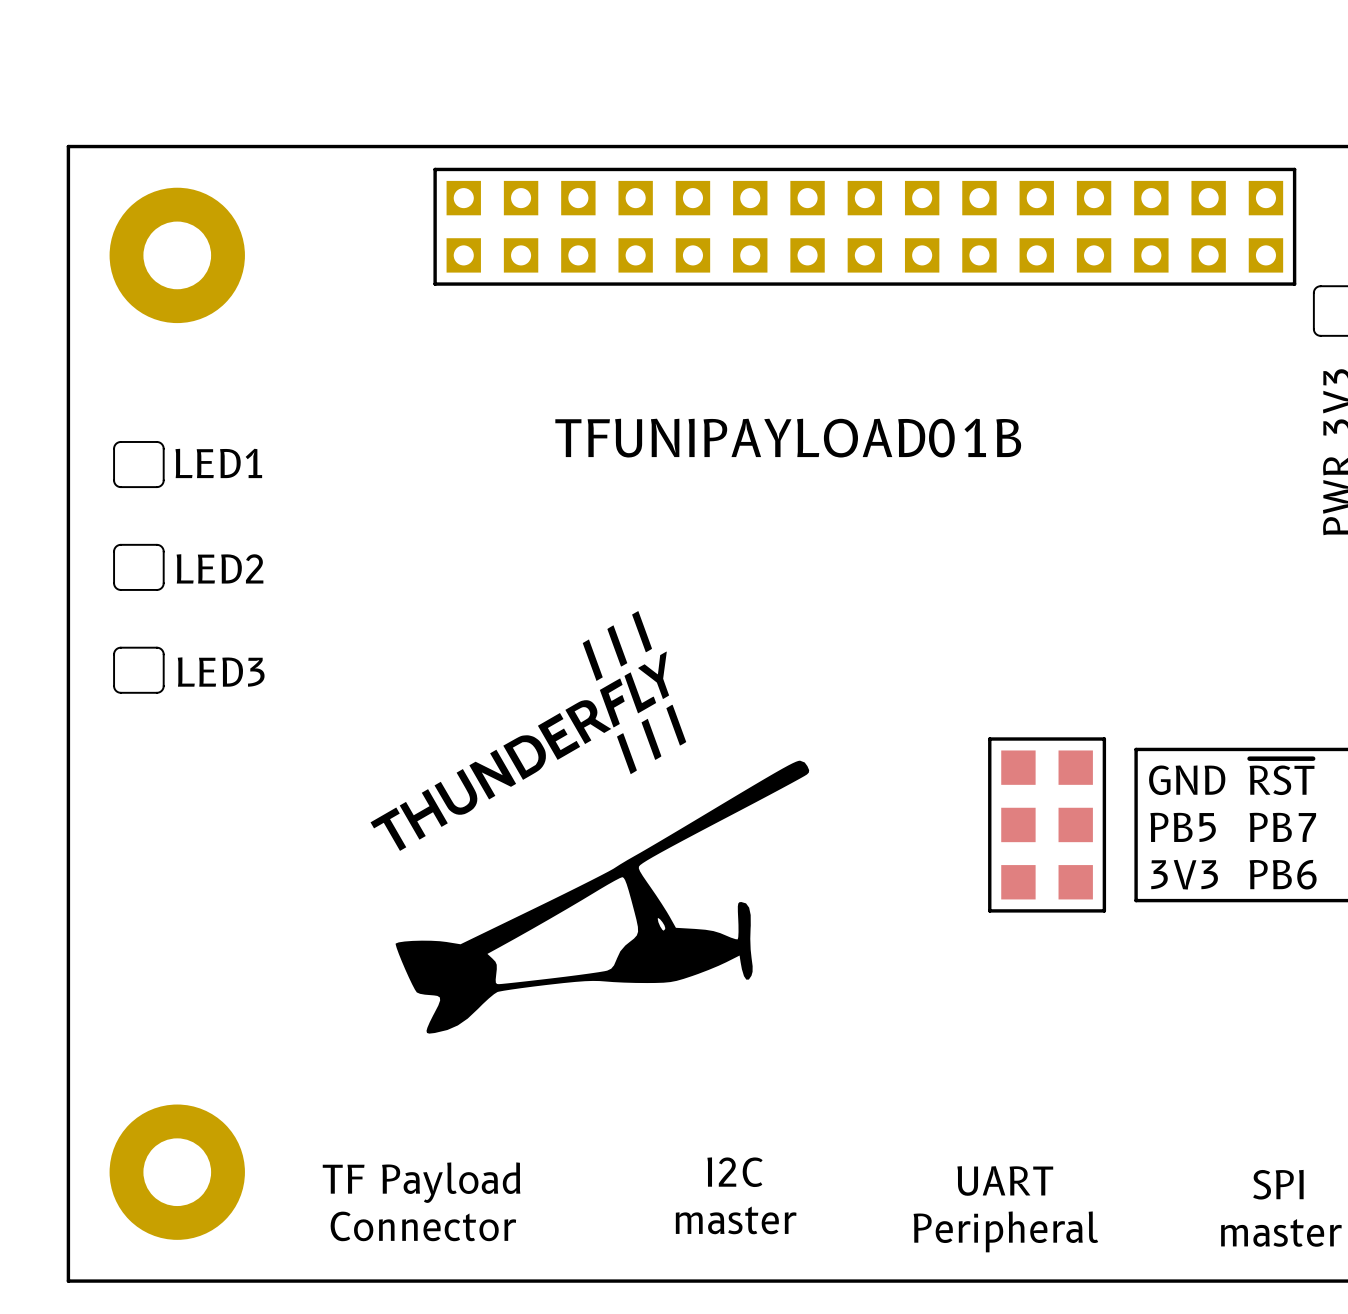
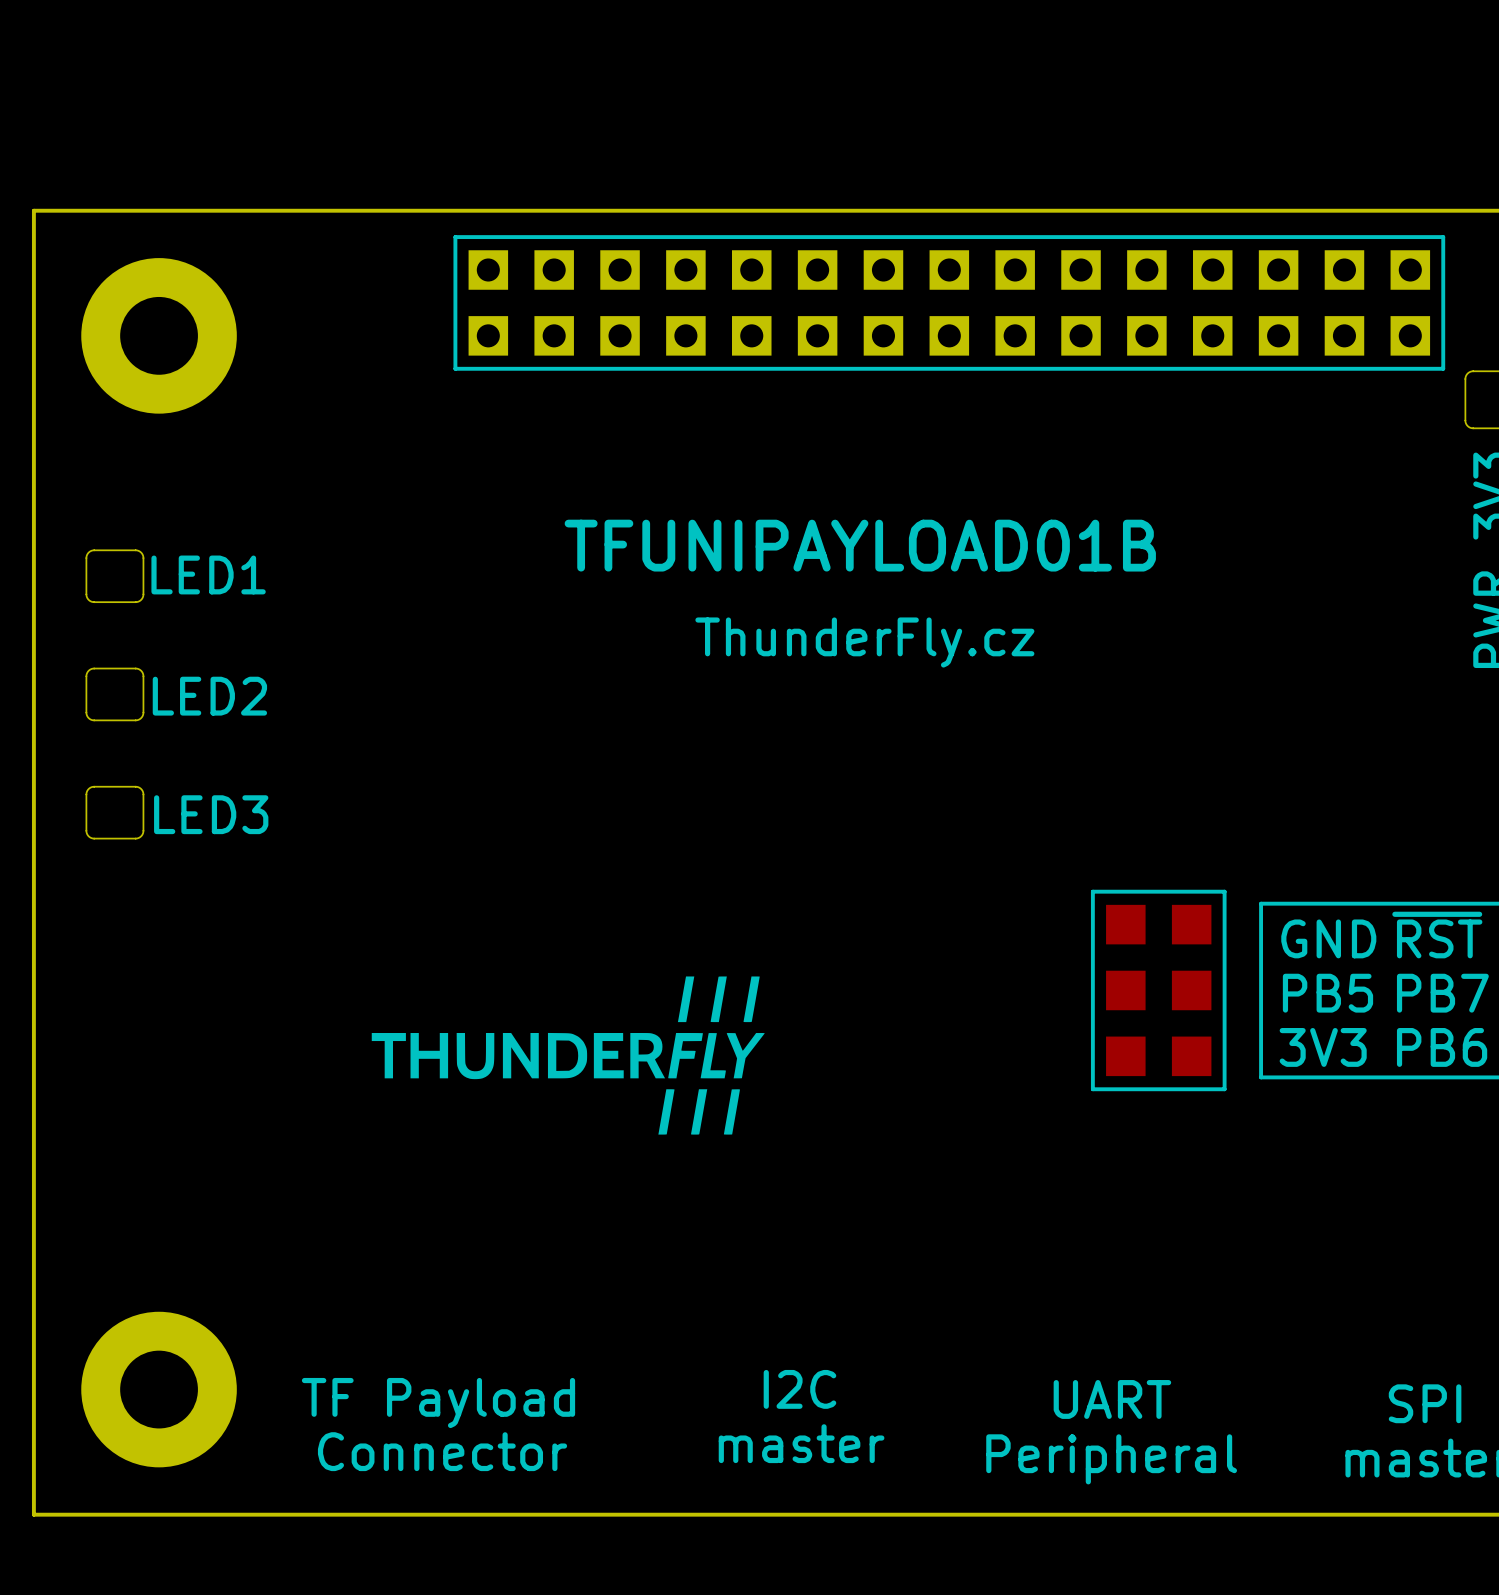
text: none -> ThunderFly.cz (864, 642)
drawing: [370, 611, 810, 1034] -> none
drawing: none -> [371, 976, 765, 1135]

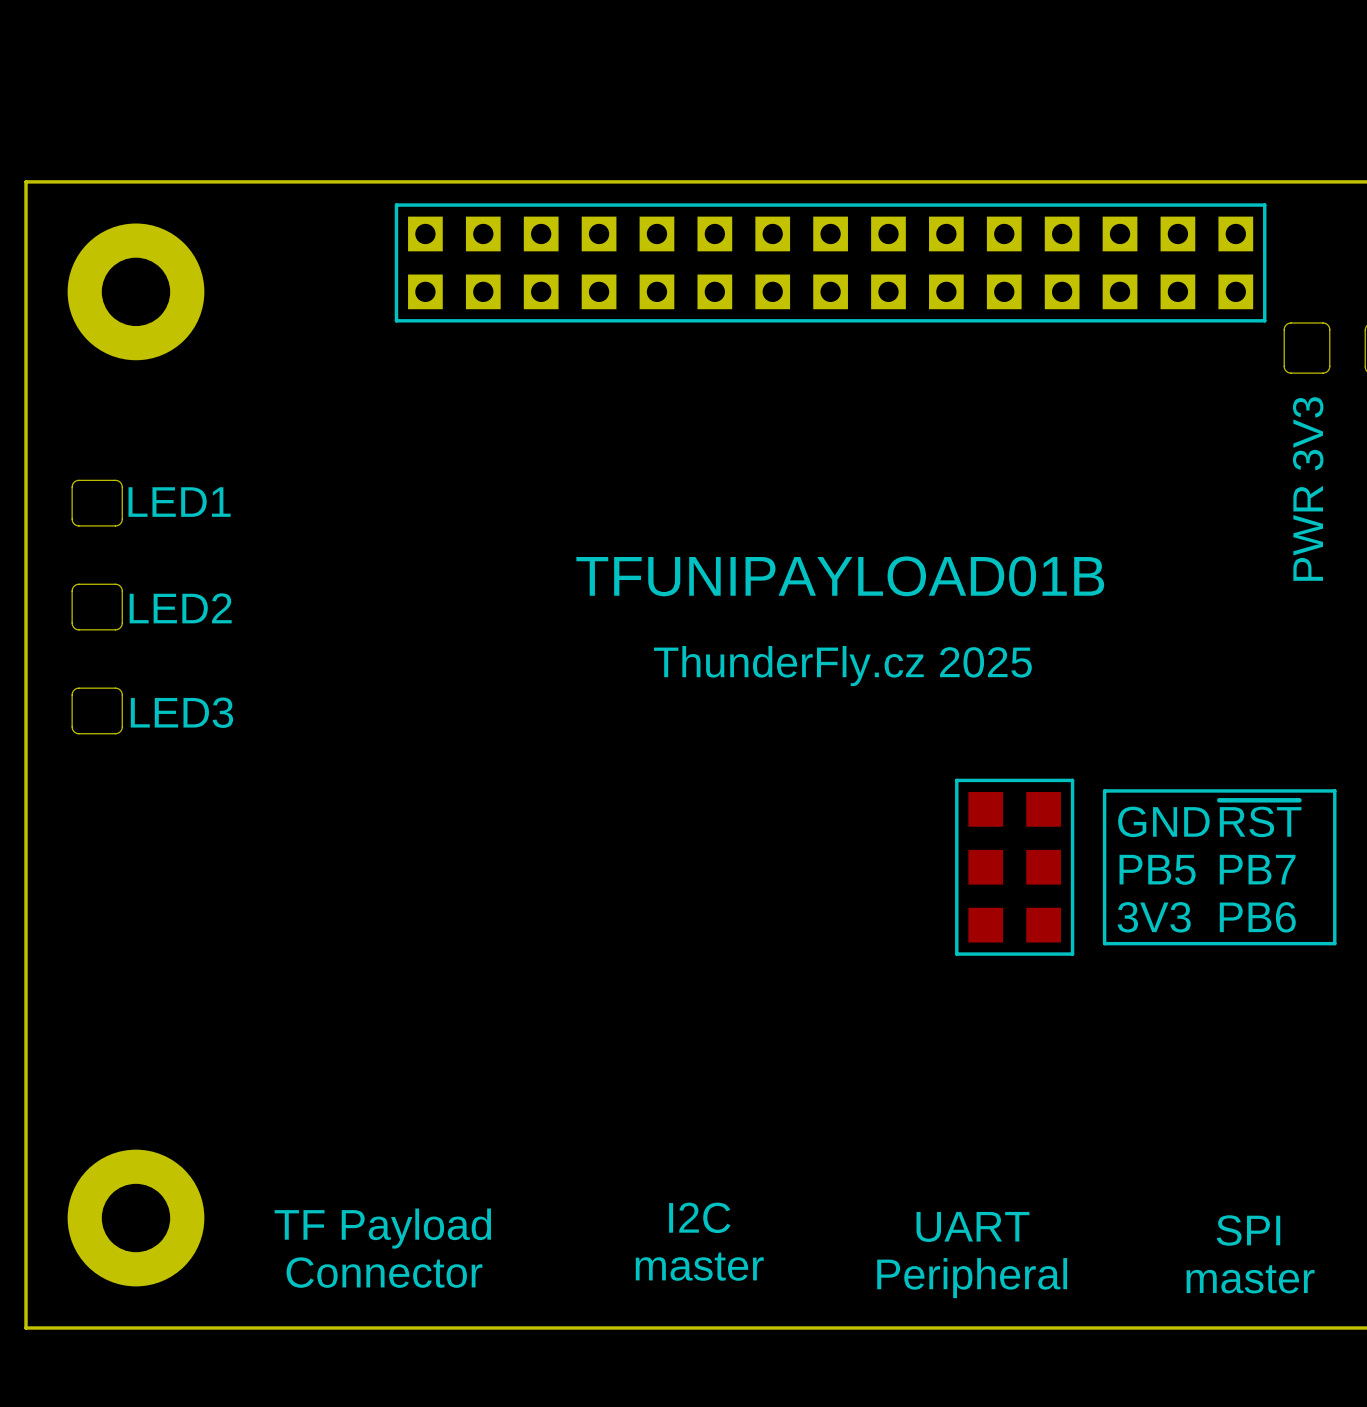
text position: TFUNIPAYLOAD01B (860, 545) -> TFUNIPAYLOAD01B (840, 576)
text: ThunderFly.cz (864, 642) -> none
text: none -> ThunderFly.cz 2025 (842, 666)
drawing: [371, 976, 765, 1135] -> none

